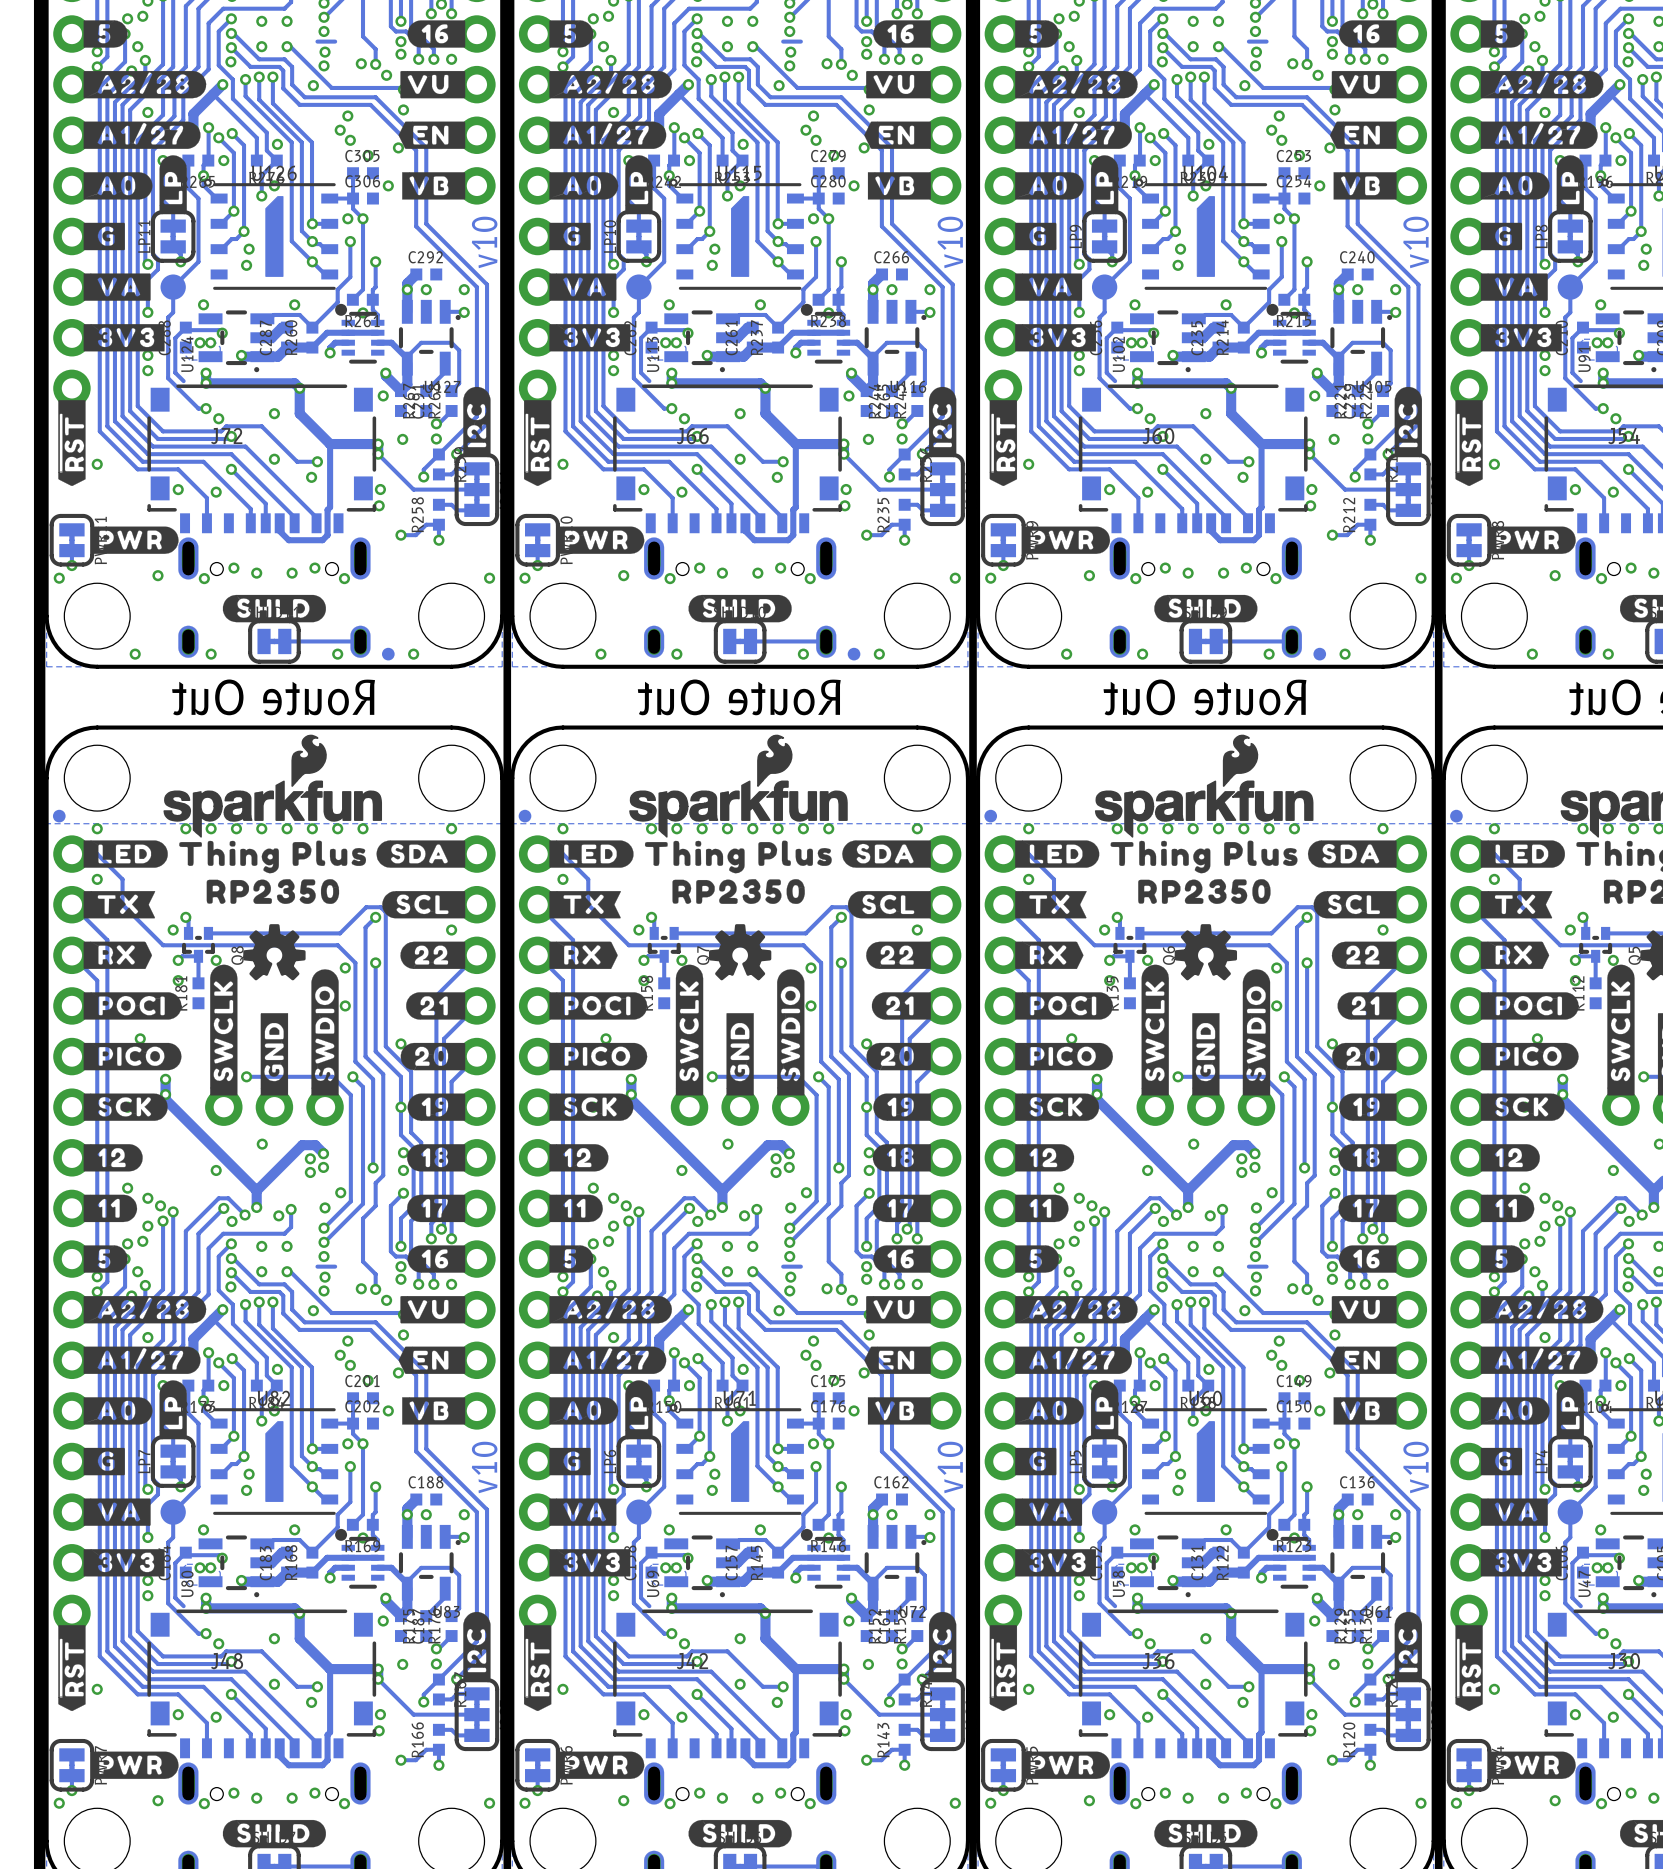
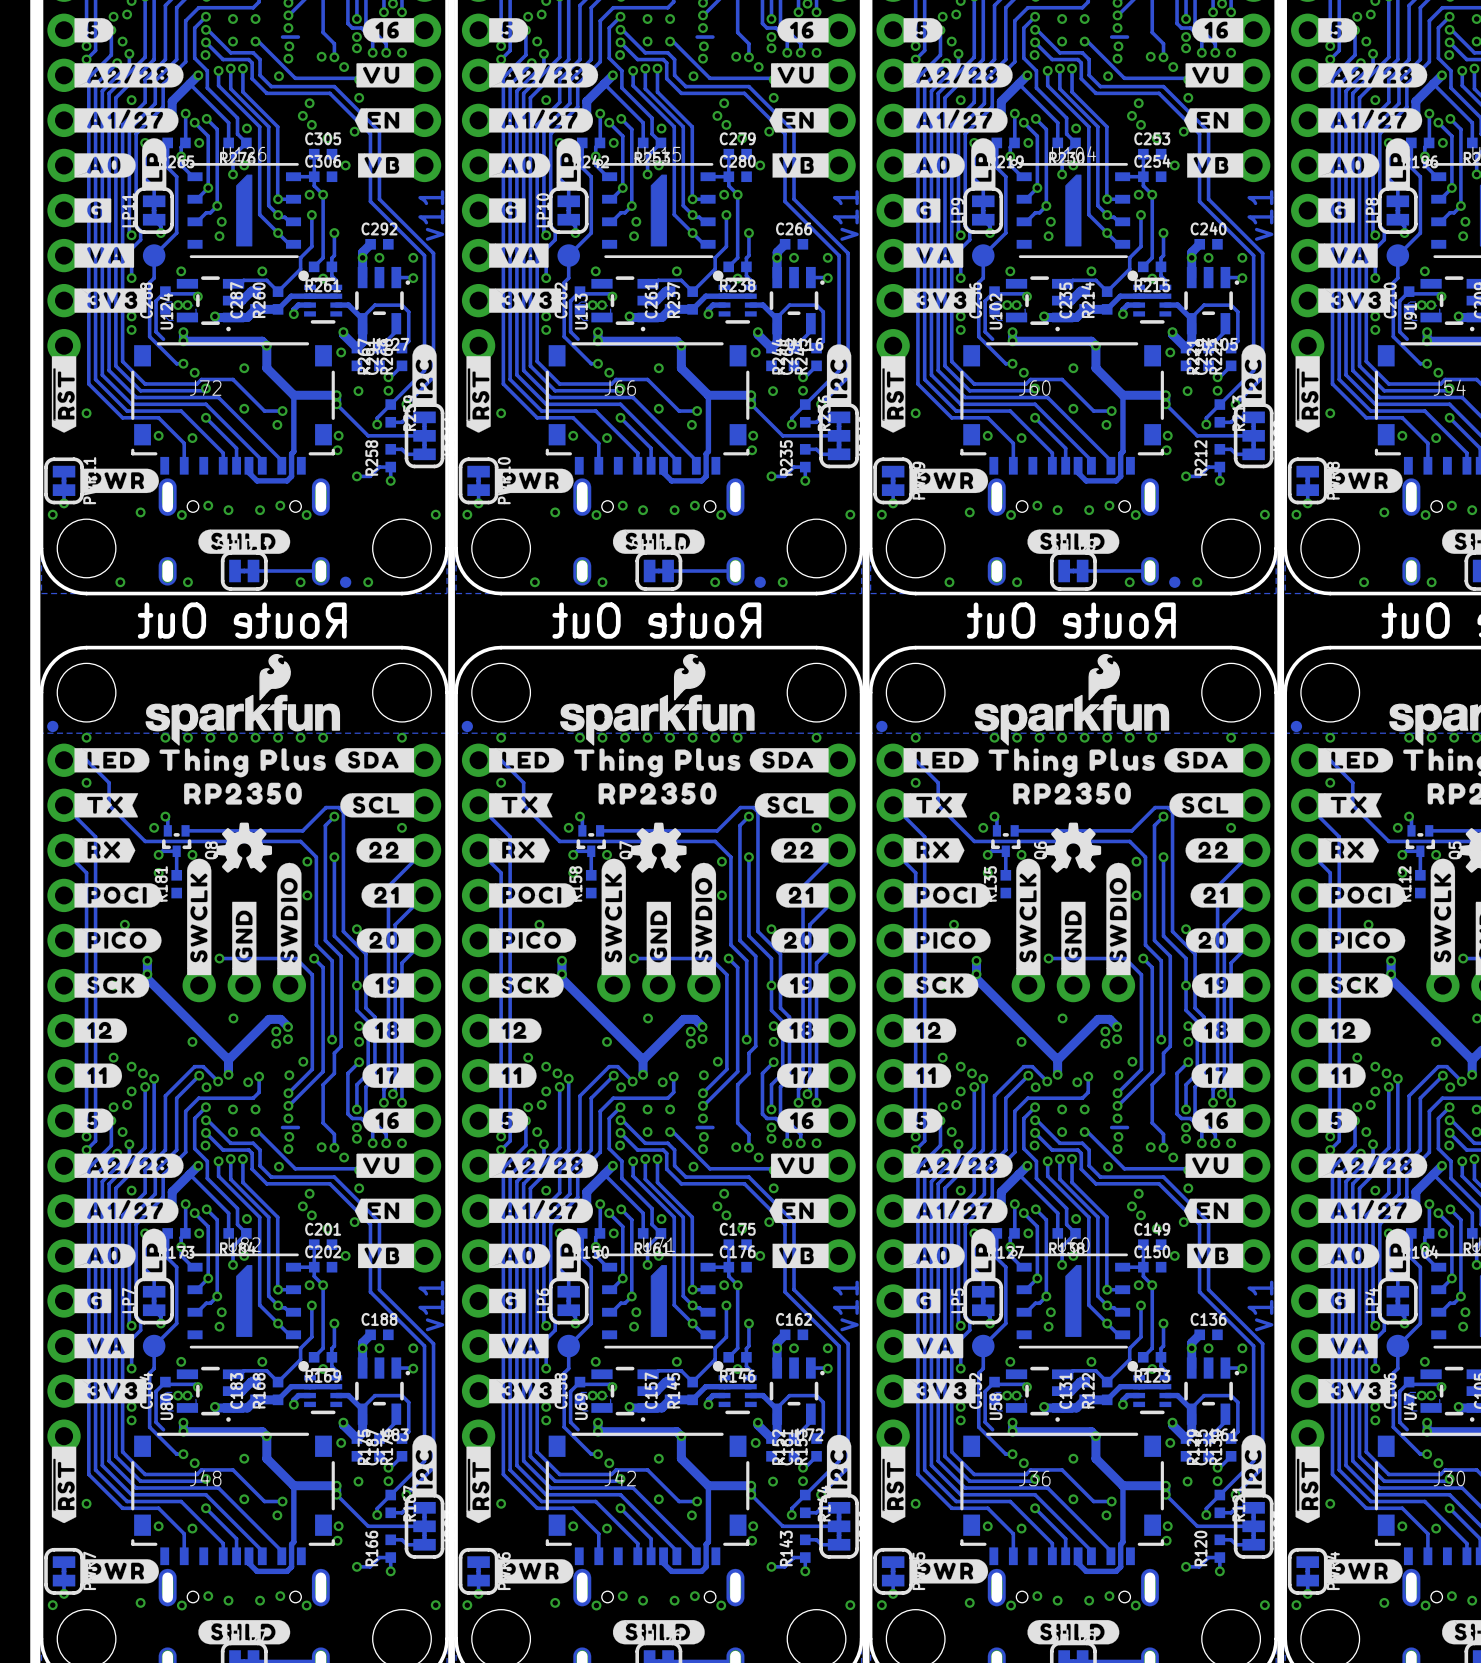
text: v10 (484, 242) -> v11 (431, 215)
text: v10 (950, 242) -> v11 (845, 215)
text: v10 (1416, 242) -> v11 (1260, 215)
text: v10 (484, 1467) -> v11 (431, 1305)
text: v10 (950, 1467) -> v11 (845, 1305)
text: v10 (1416, 1467) -> v11 (1260, 1305)

